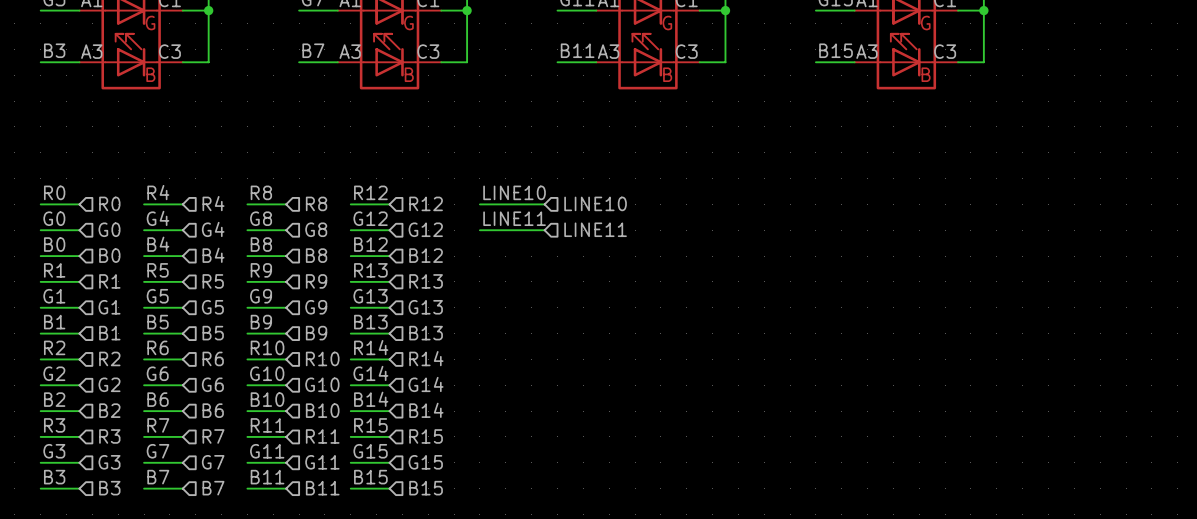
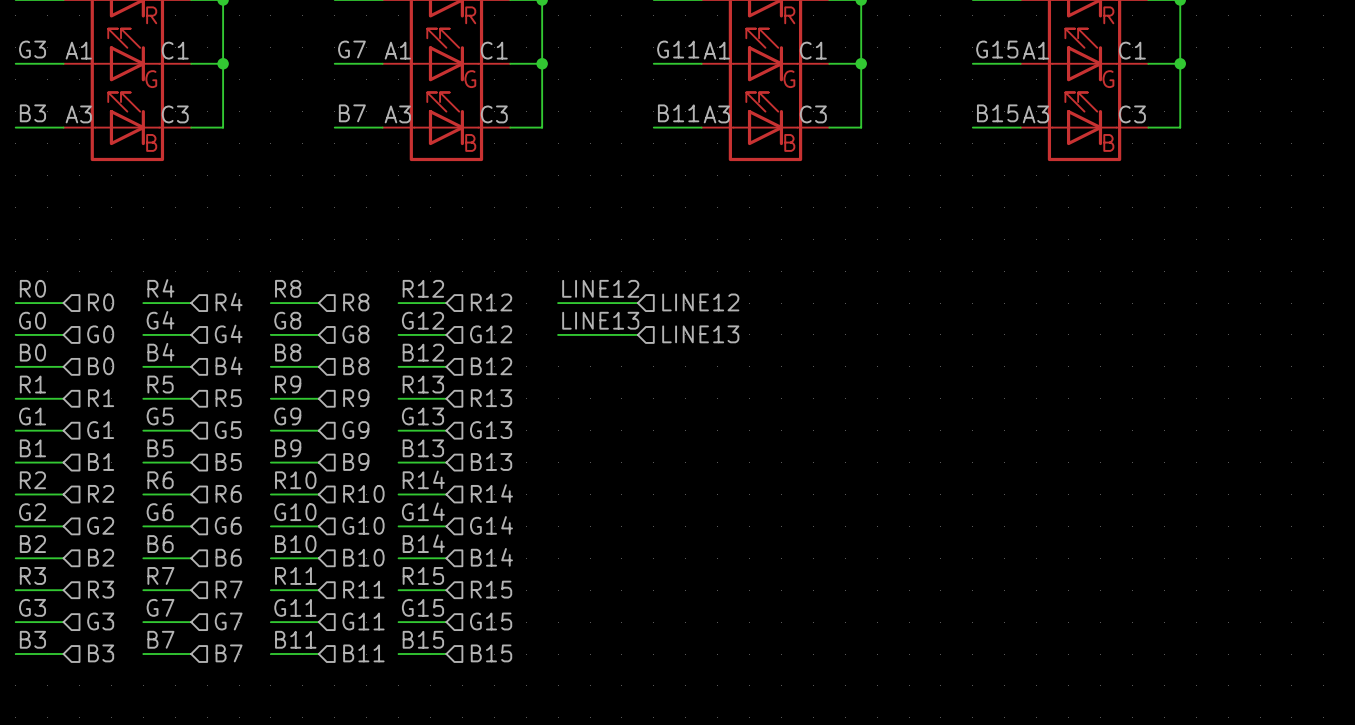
label: LINE10 (514, 192) -> LINE12 (600, 288)
hierarchical label: LINE10 (595, 203) -> LINE12 (700, 302)
label: LINE11 (514, 218) -> LINE13 (600, 320)
hierarchical label: LINE11 (595, 229) -> LINE13 (700, 334)

